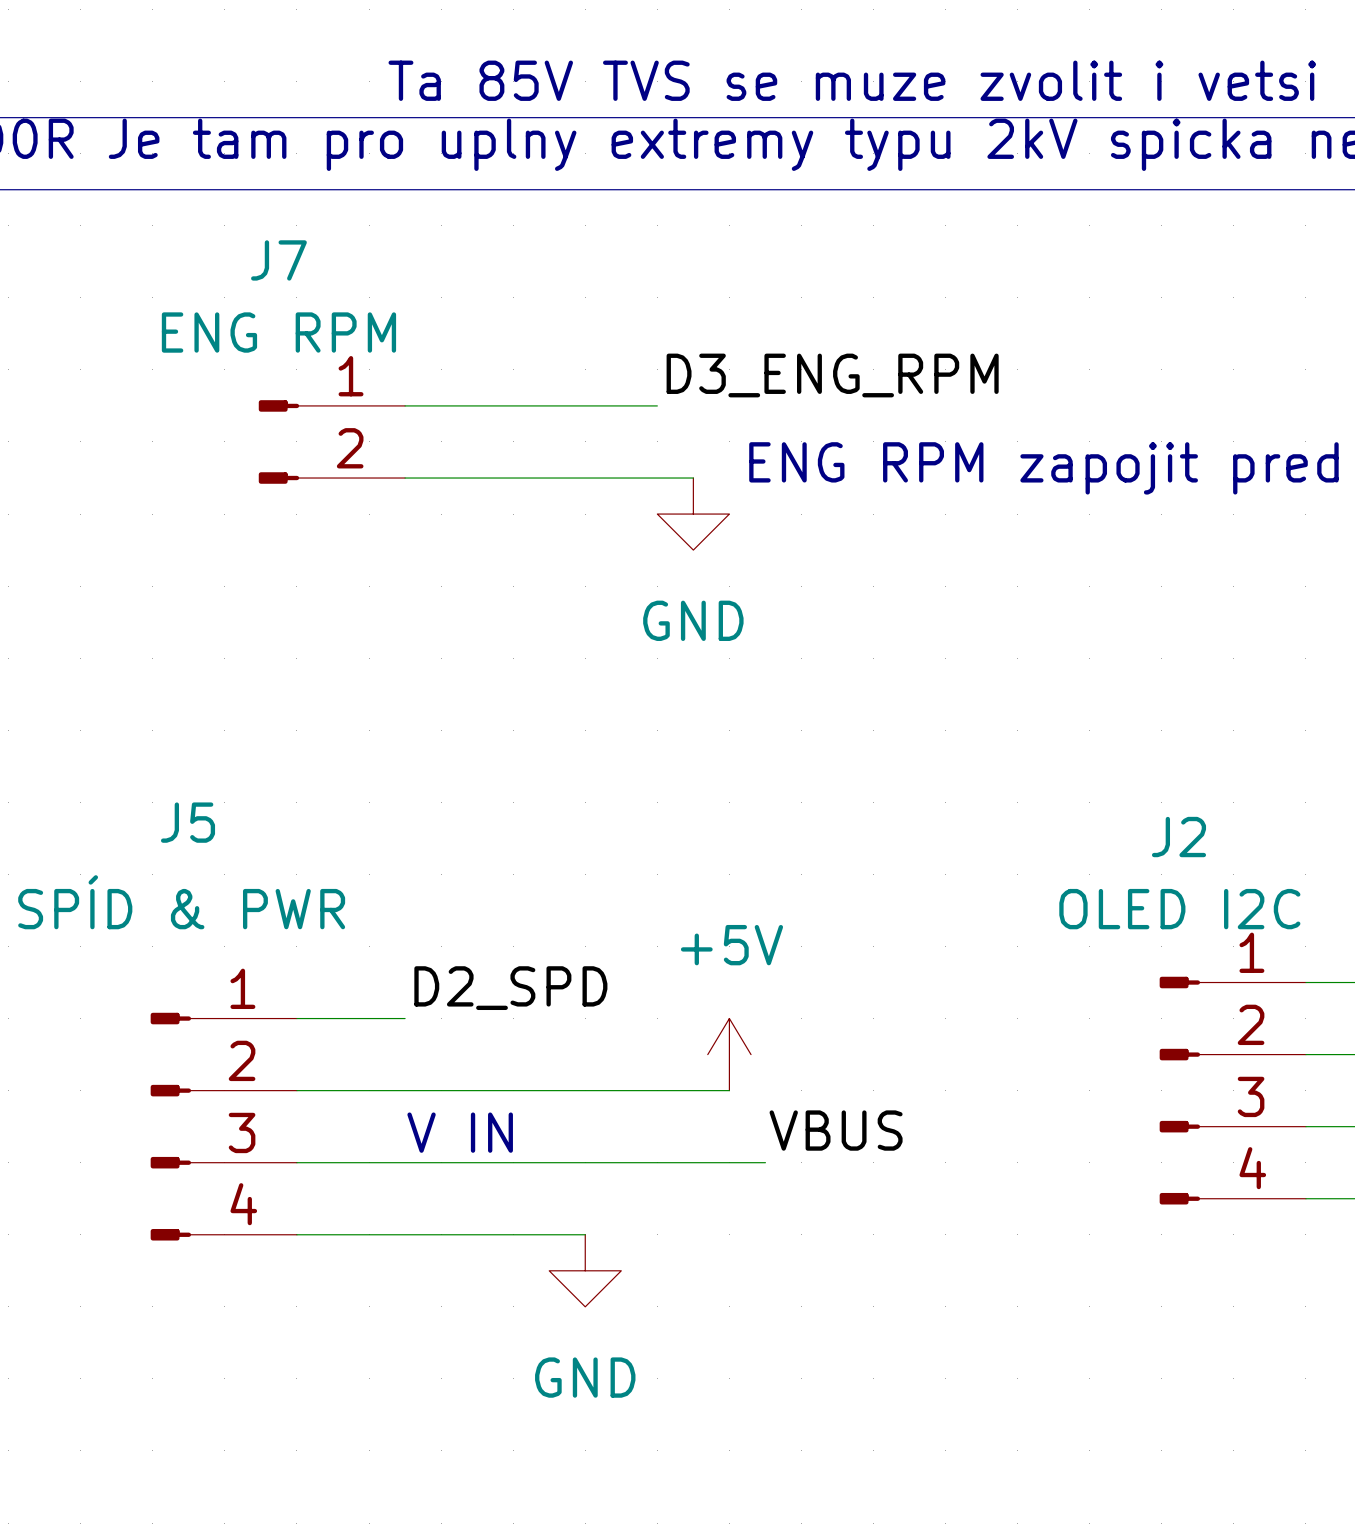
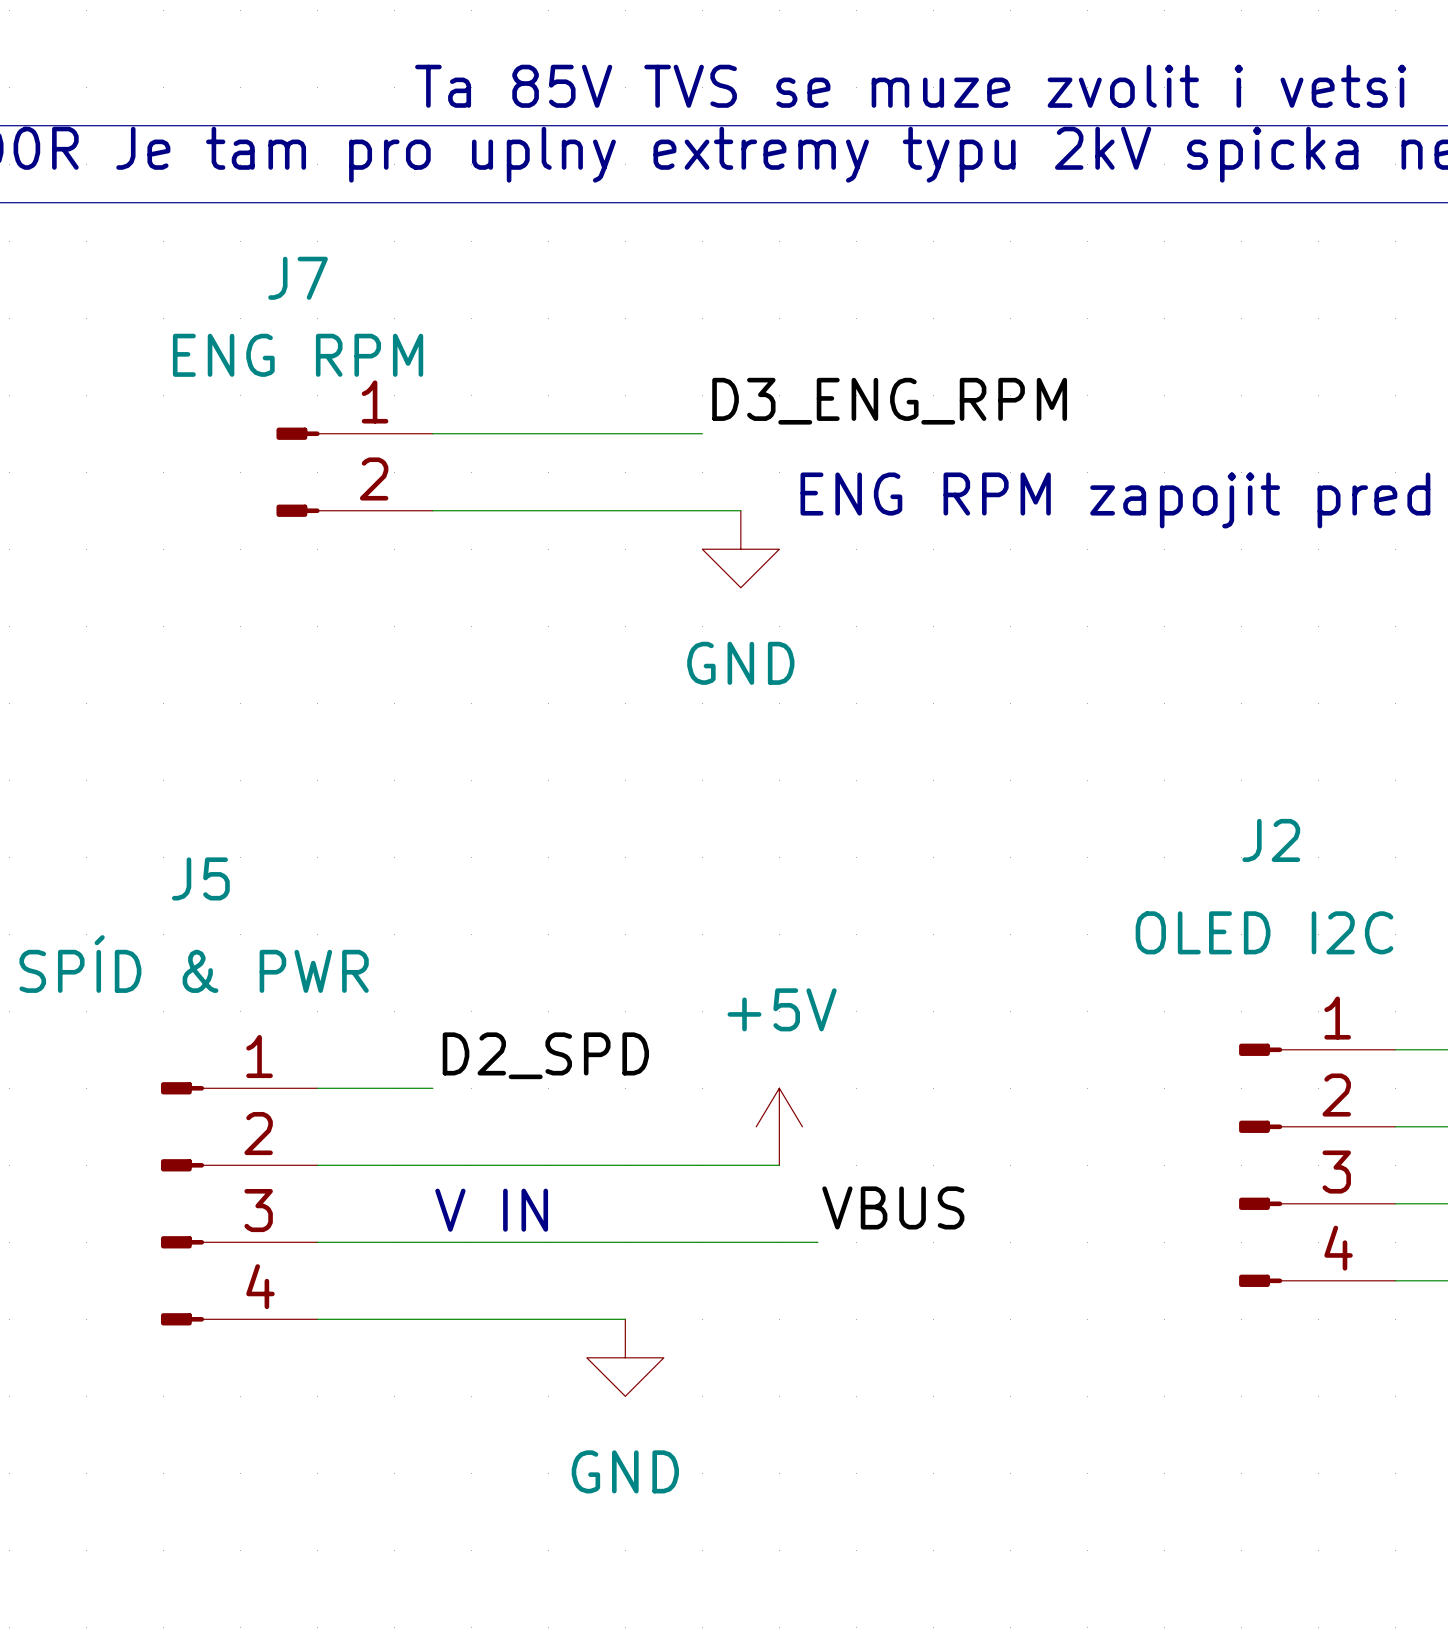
J2 name position: J2 (1178, 837) -> J2 (1271, 840)
J2 value position: OLED I2C (1179, 909) -> OLED I2C (1264, 932)

